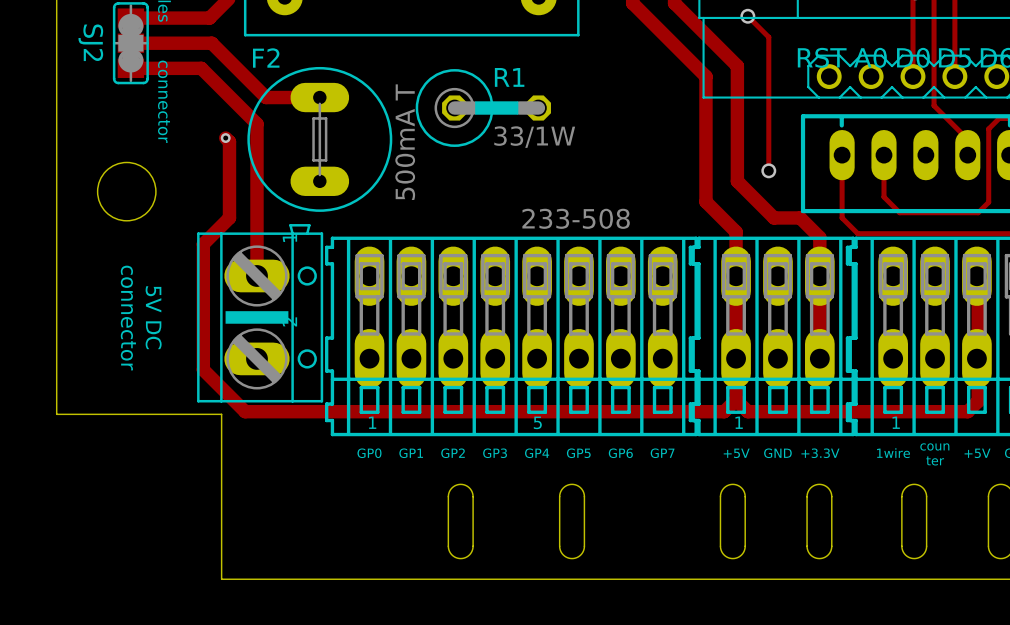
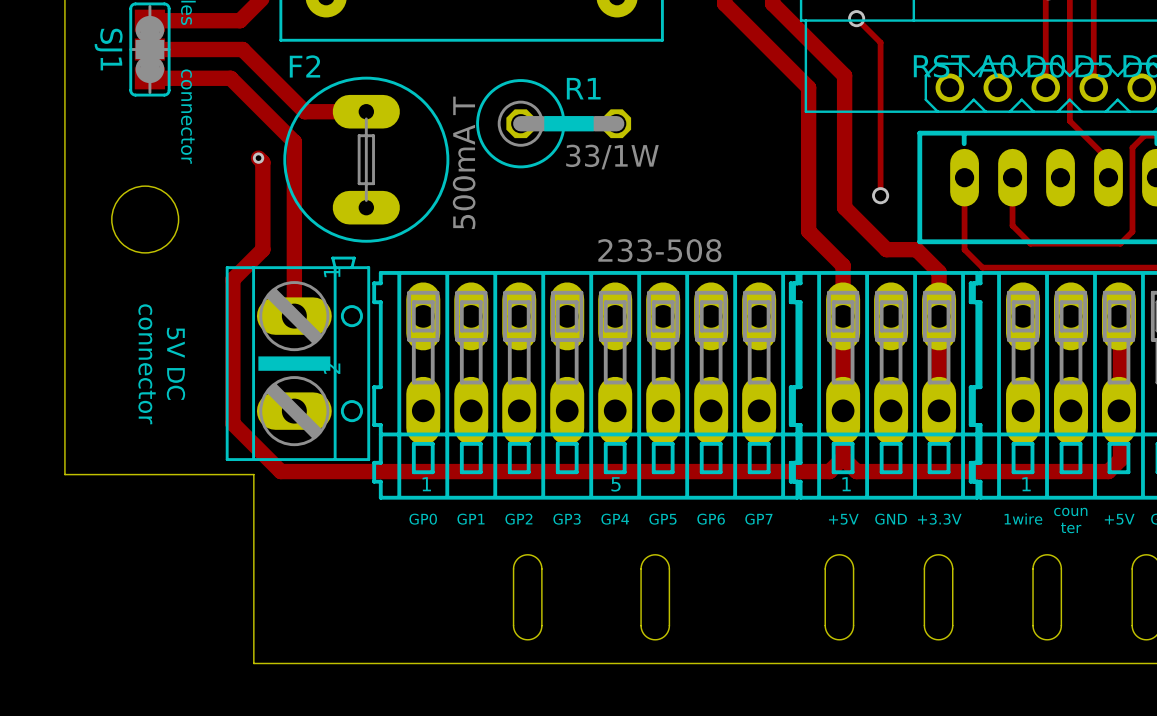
SJ2 name: SJ2 (90, 42) -> SJ1 (108, 49)

